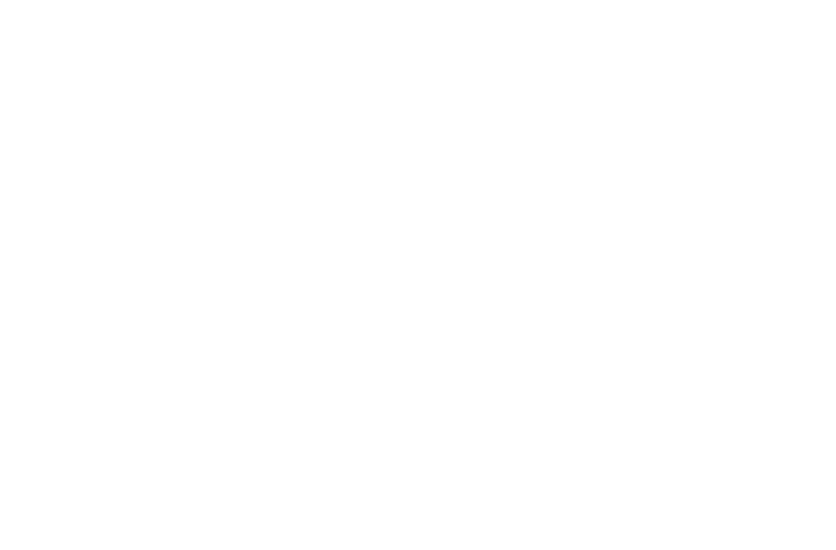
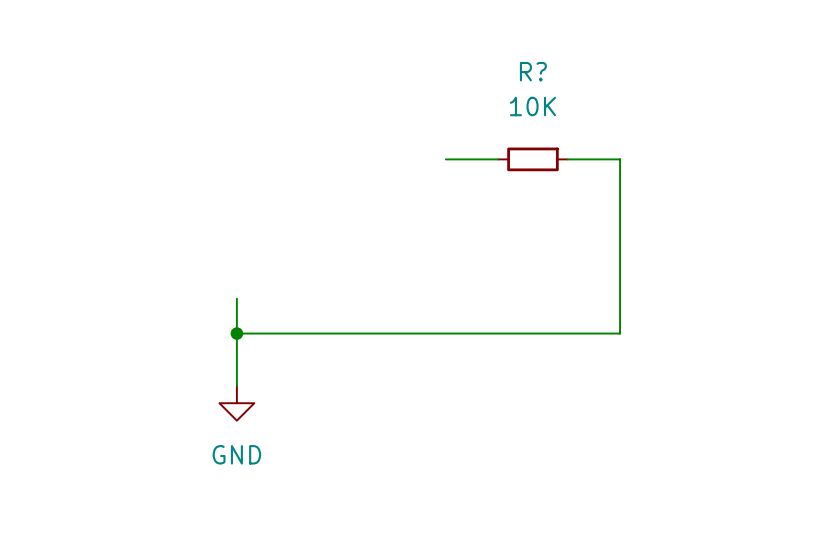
wire: none -> (445, 159) (498, 159)
R?: none -> 10K (532, 159)
wire: none -> (567, 159) (620, 159) (620, 333) (236, 333)
wire: none -> (236, 298) (236, 385)
junction: none -> (236, 333)
power symbol: none -> GND (236, 403)

